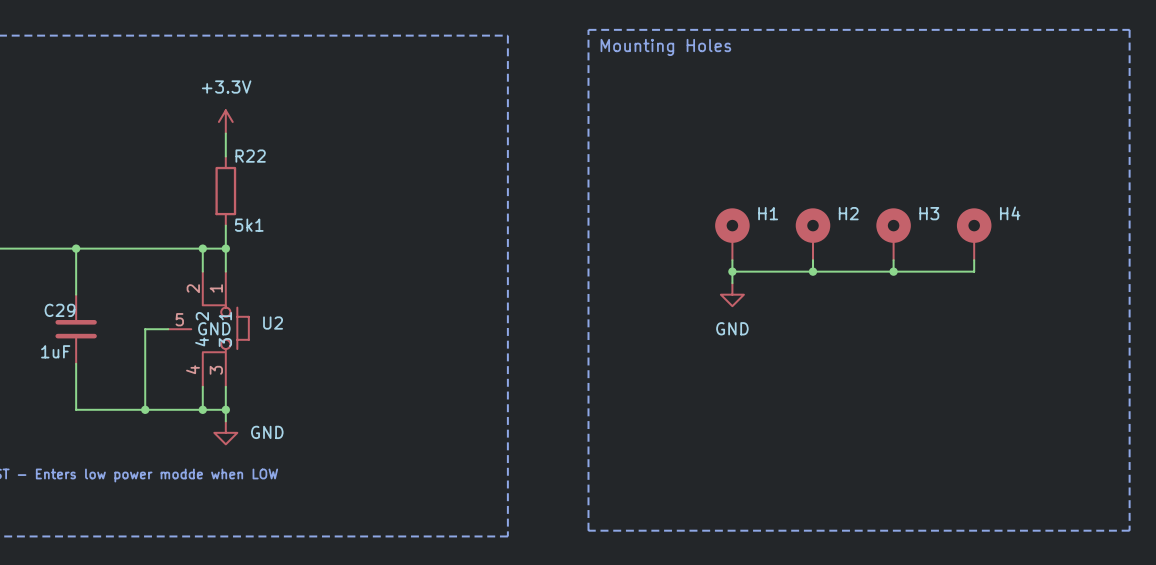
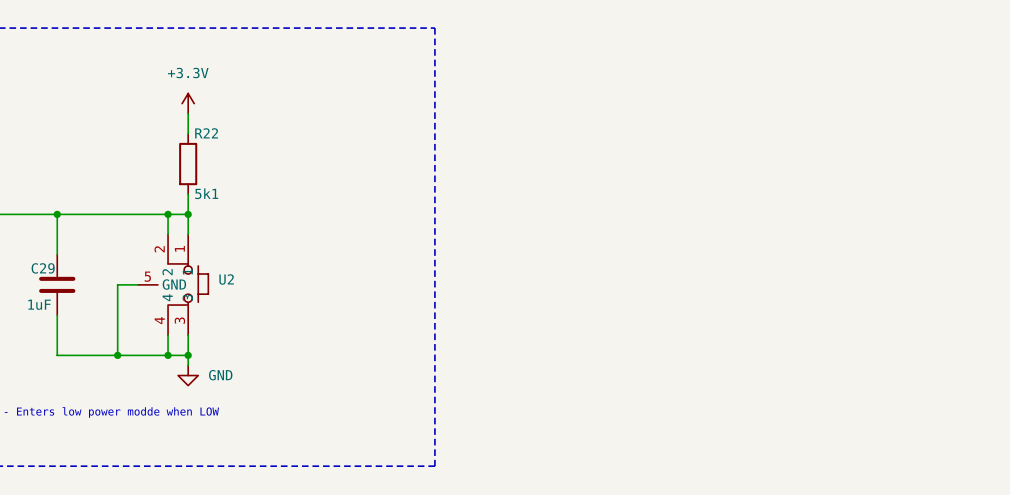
line: (588, 29) (1129, 29) (1129, 530) (588, 530) (588, 29) -> none
text: Mounting Holes (665, 47) -> none
H1: (732, 234) -> none
H2: (813, 234) -> none
H3: (893, 234) -> none
H4: (974, 234) -> none
wire: (732, 260) (732, 283) -> none
wire: (813, 260) (813, 271) -> none
wire: (893, 260) (893, 271) -> none
wire: (974, 260) (974, 271) (732, 271) -> none
junction: (732, 271) -> none
junction: (813, 271) -> none
junction: (893, 271) -> none
power symbol: GND (732, 294) -> none

